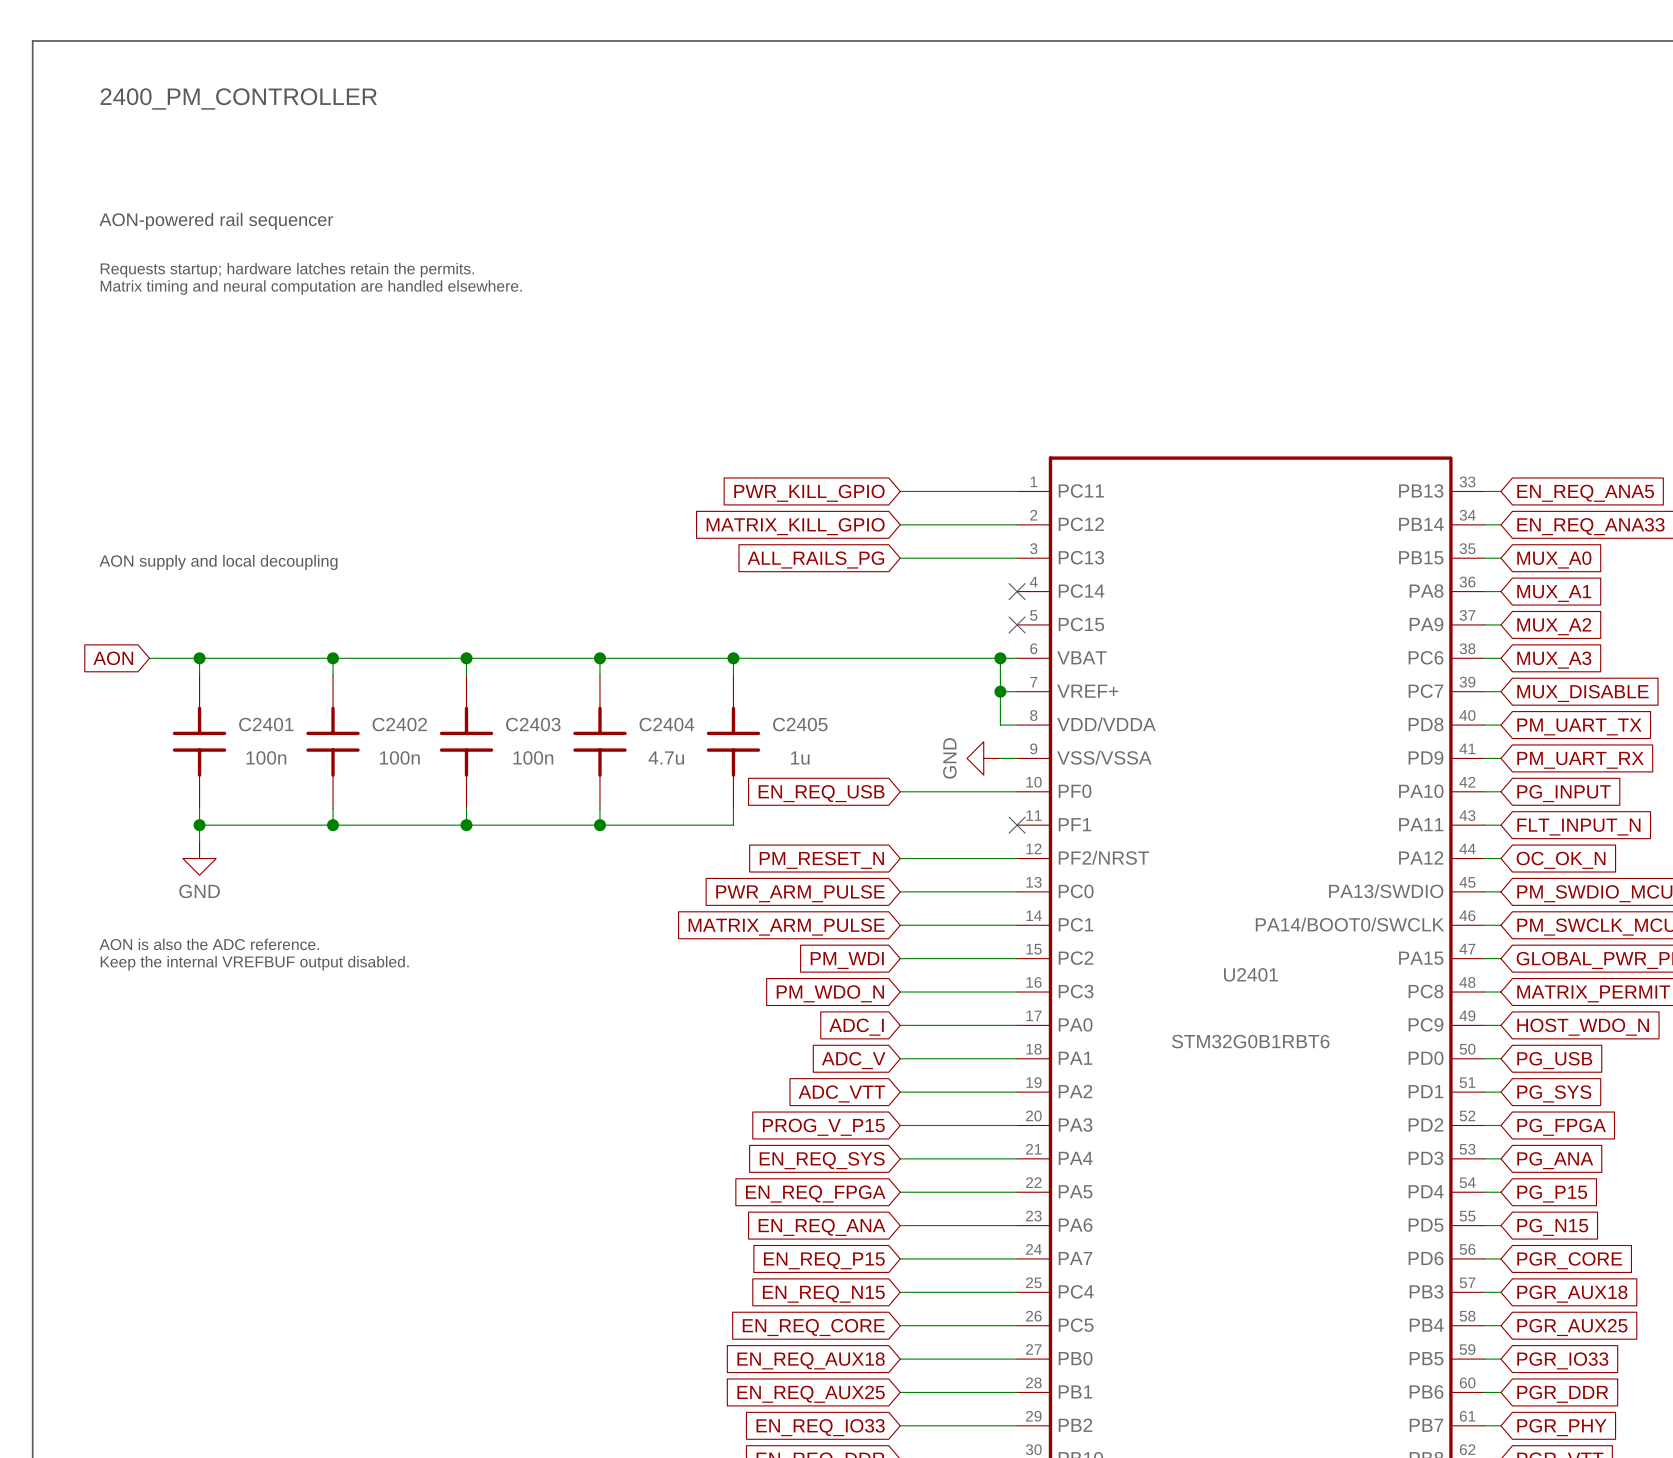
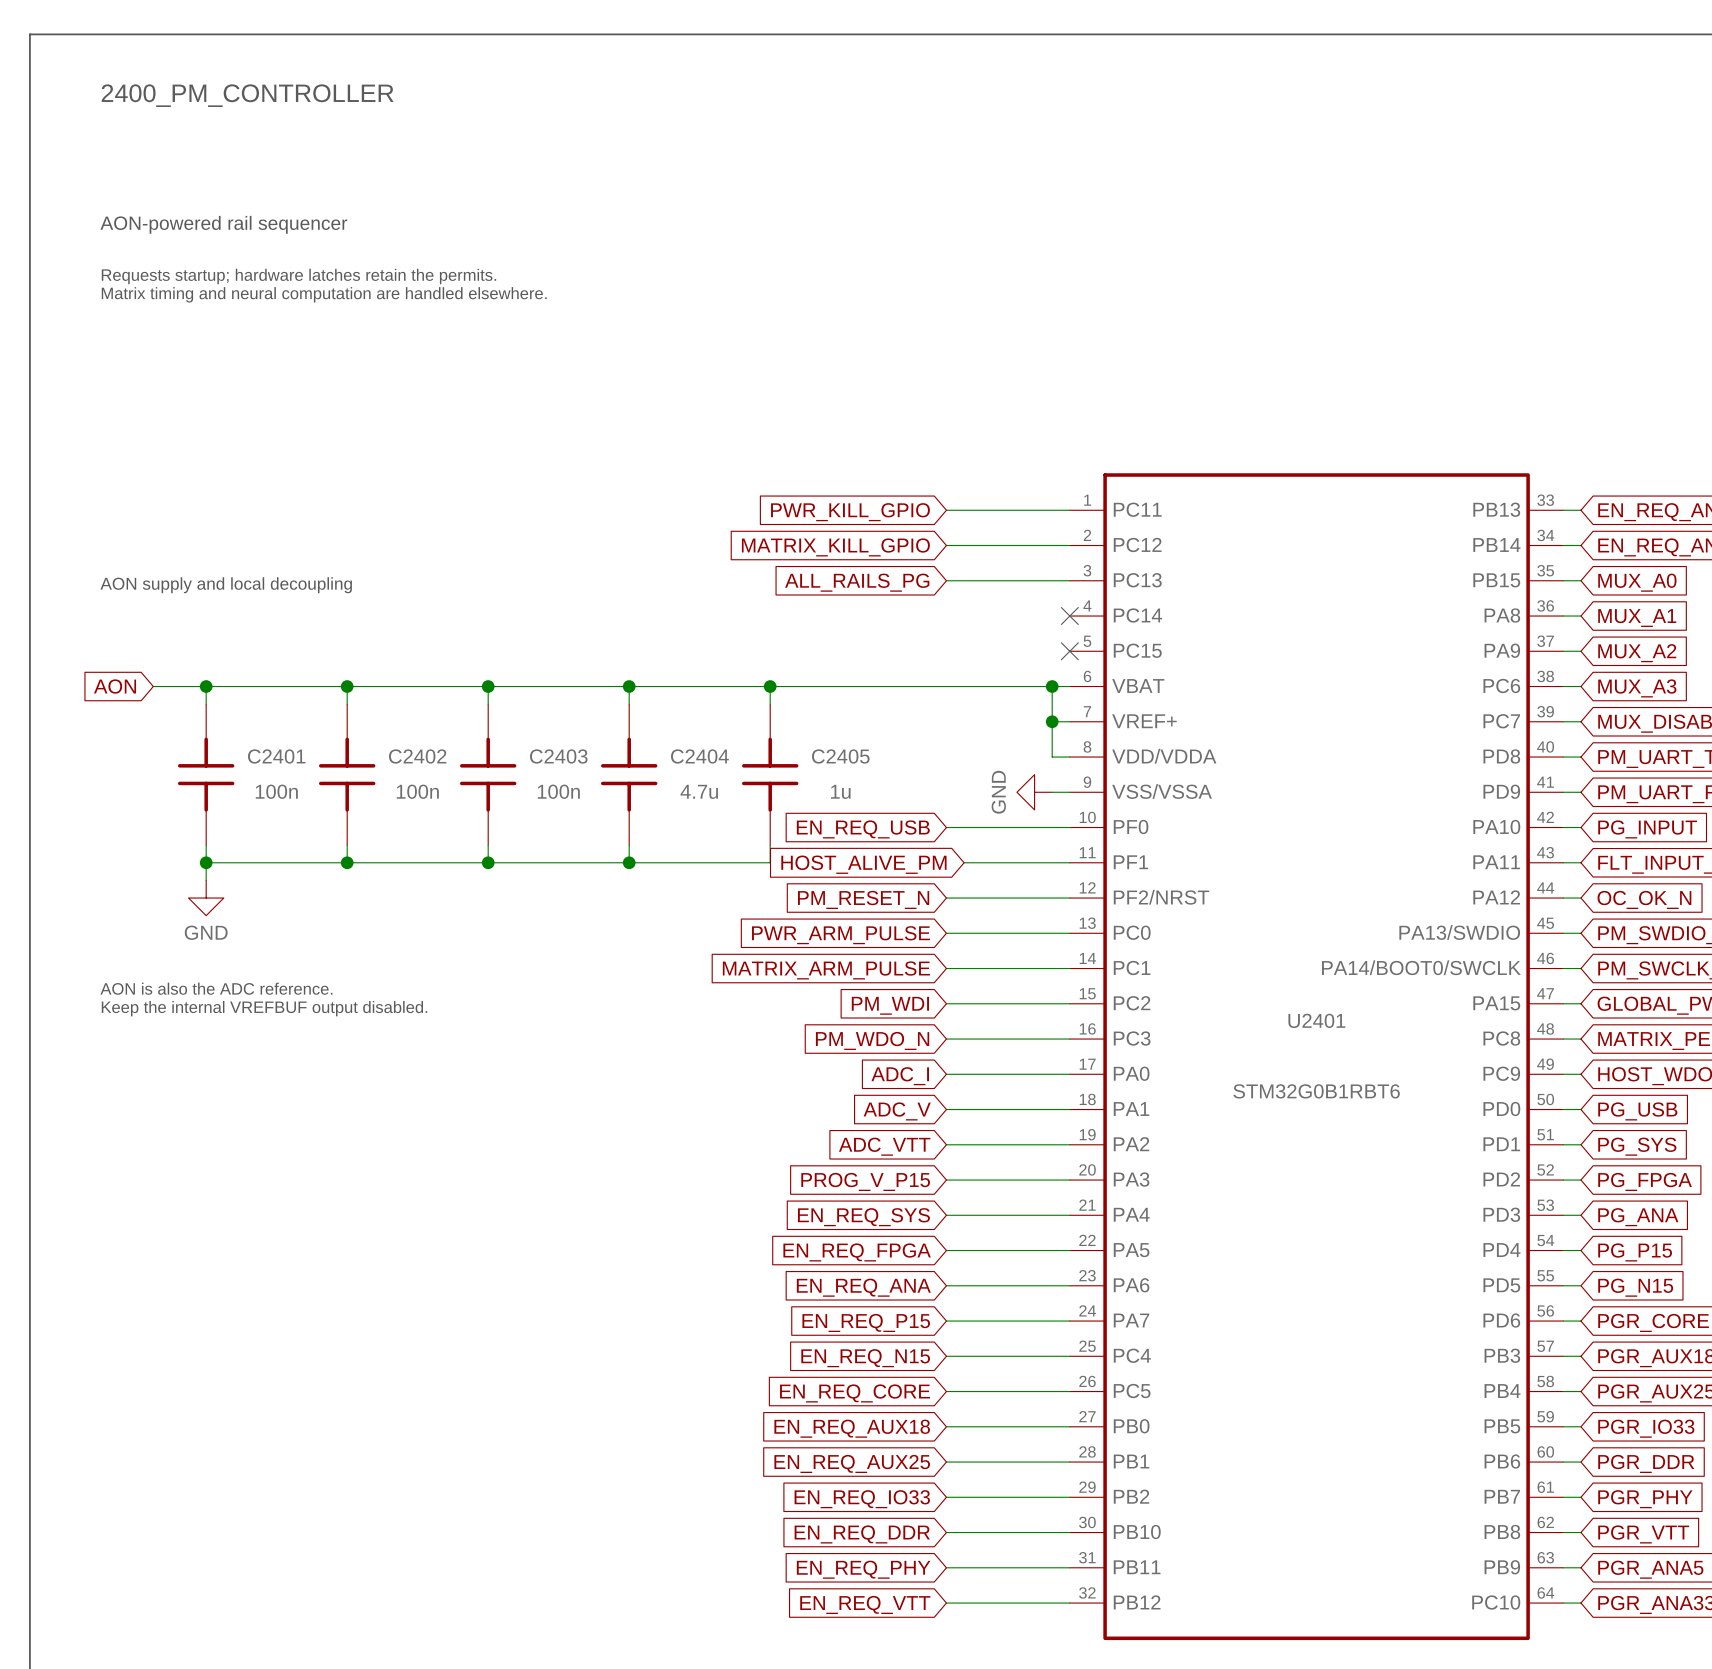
wire: none -> (964, 862) (1069, 862)
no-connect mark: (1017, 825) -> none
global label: none -> HOST_ALIVE_PM (863, 864)

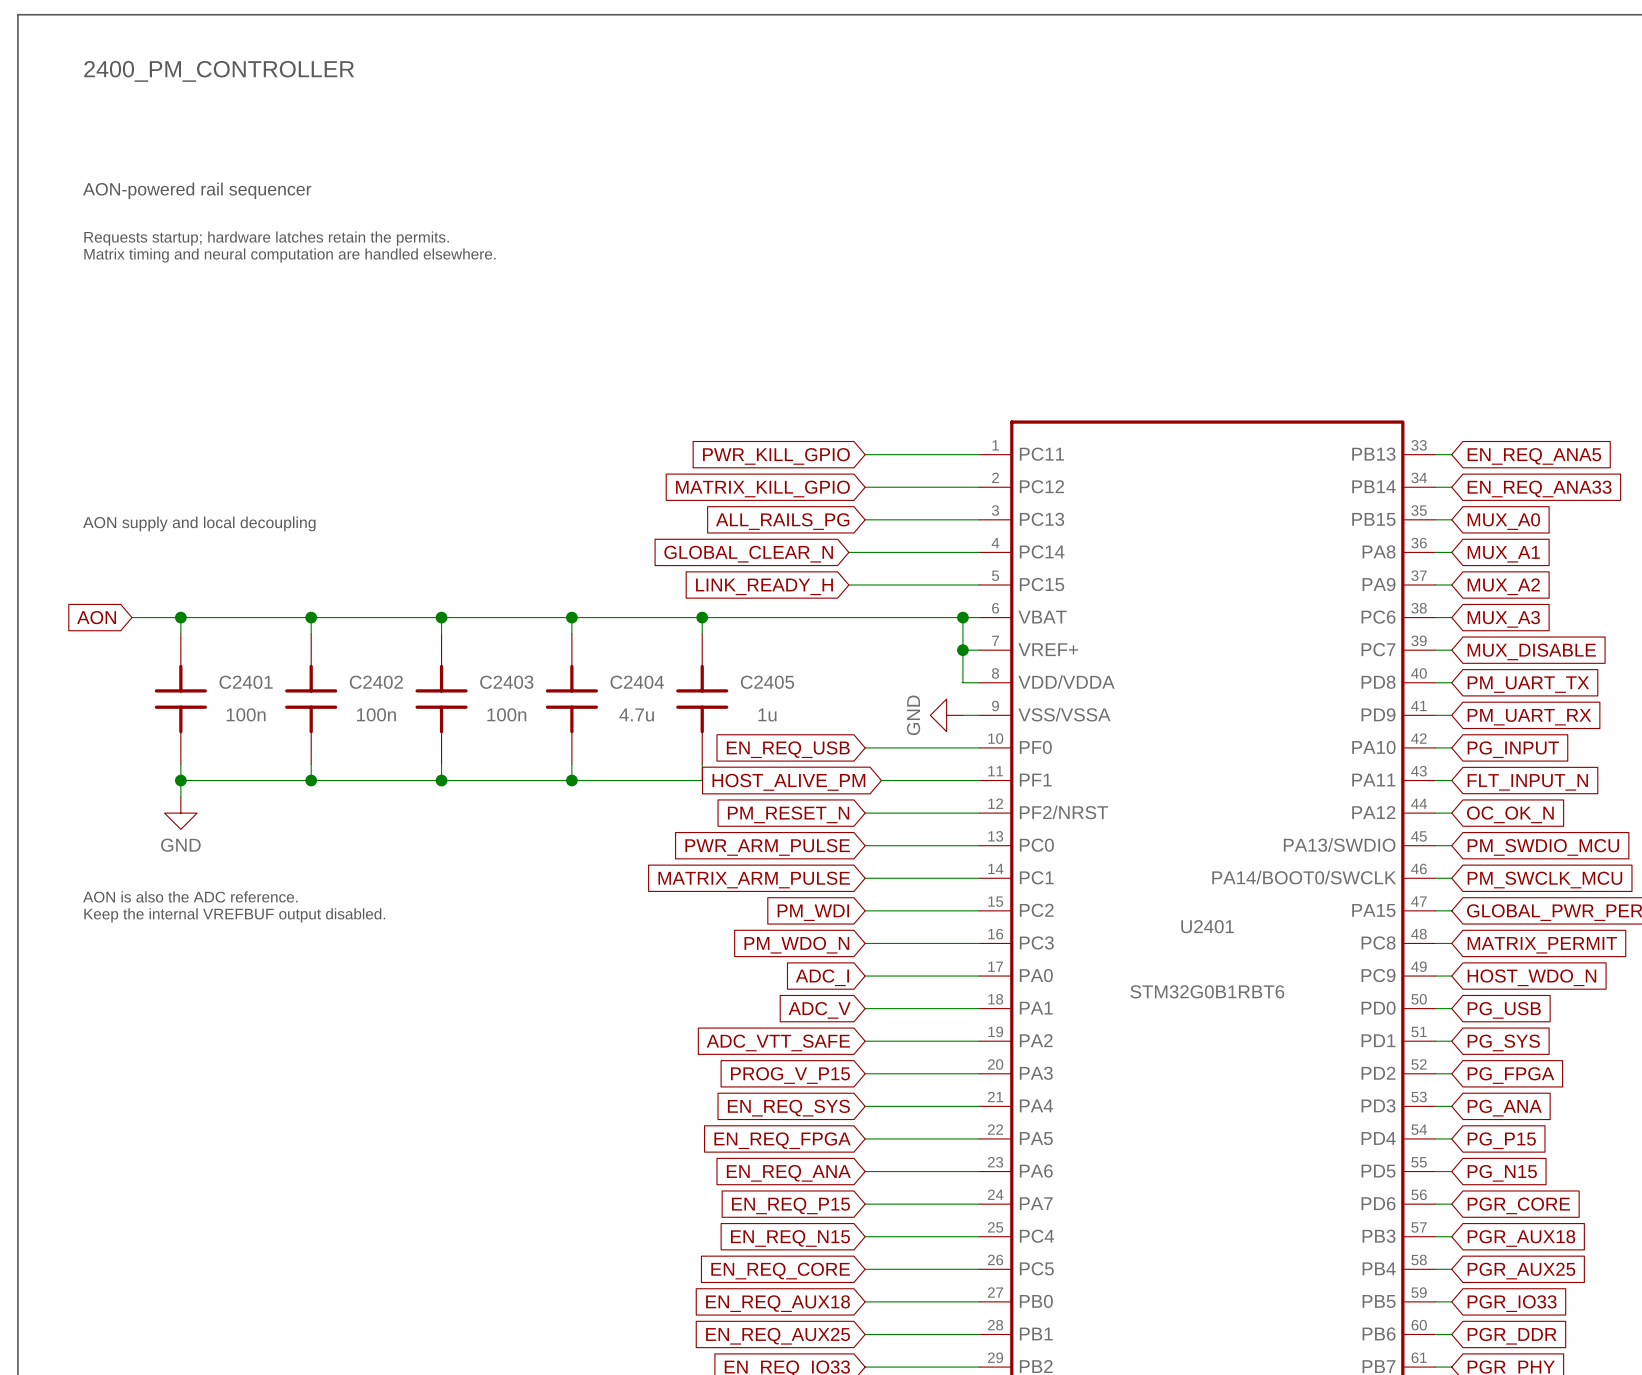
wire: none -> (848, 552) (979, 552)
no-connect mark: (1069, 616) -> none
global label: none -> GLOBAL_CLEAR_N (748, 554)
wire: none -> (848, 585) (979, 585)
no-connect mark: (1069, 651) -> none
global label: none -> LINK_READY_H (764, 586)
global label: ADC_VTT (884, 1146) -> ADC_VTT_SAFE (778, 1042)

